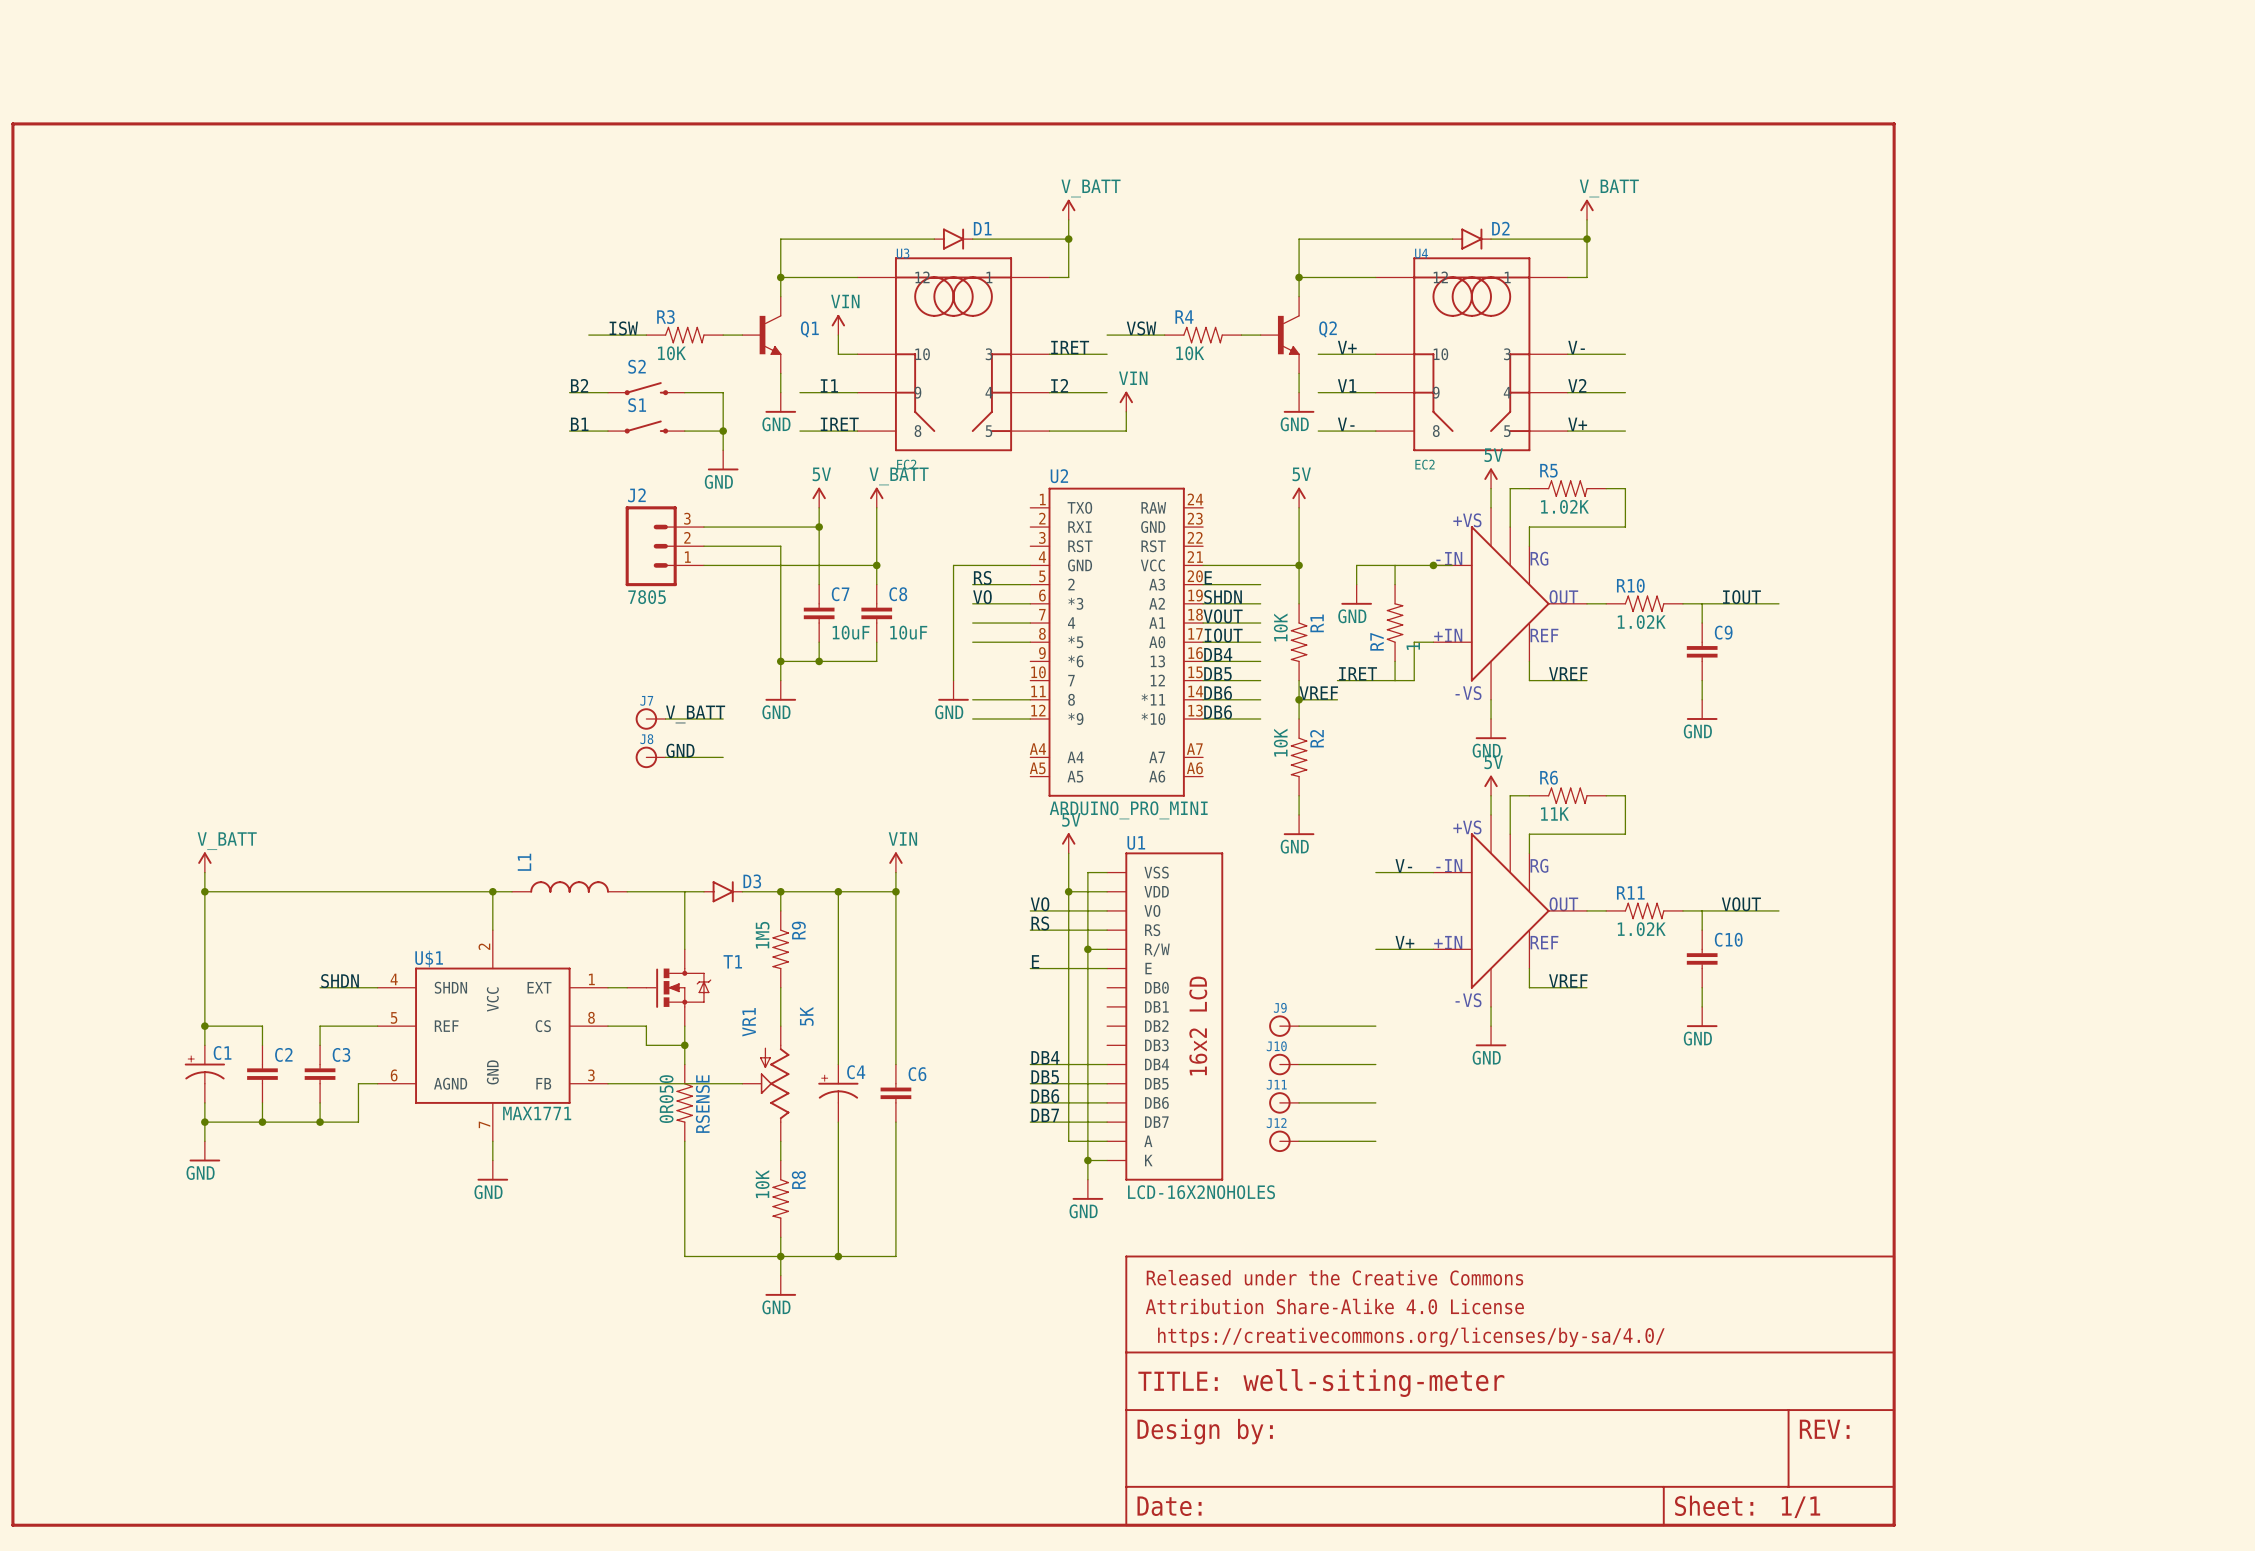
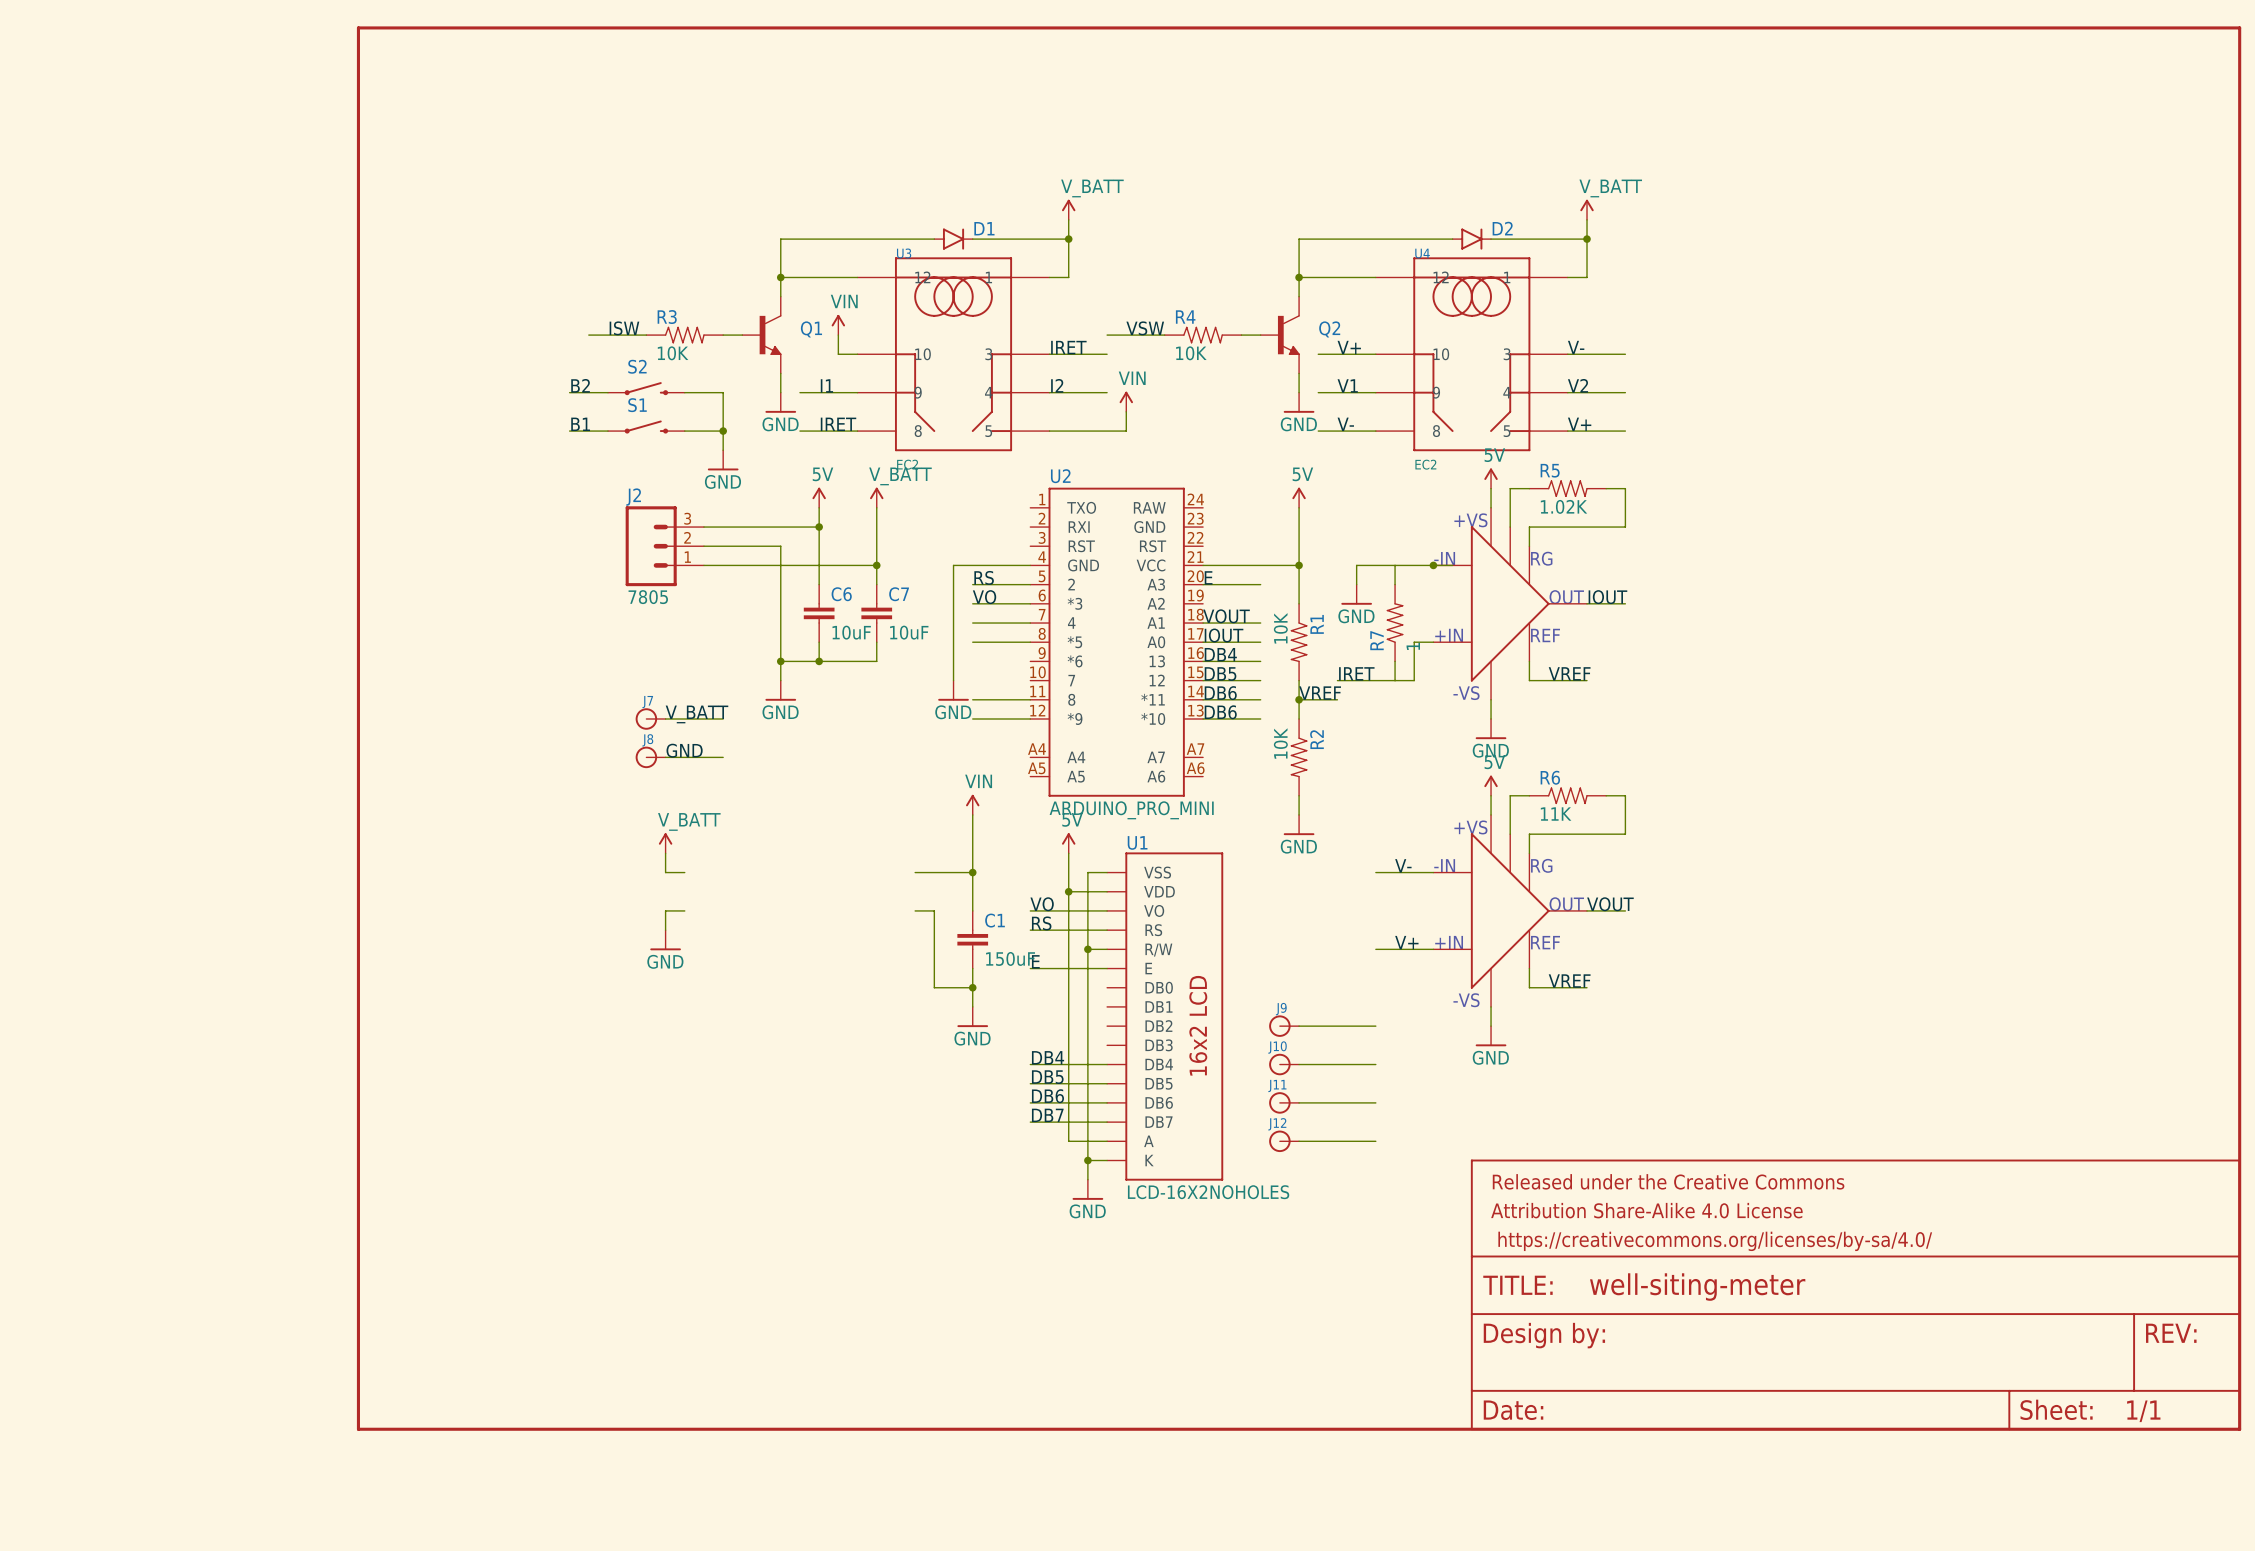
C7 name: C7 (840, 594) -> C6 (841, 594)
C8 name: C8 (898, 594) -> C7 (899, 594)
label: SHDN (1223, 597) -> none
label position: IOUT (1741, 597) -> IOUT (1607, 597)
wire: (1203, 603) (1260, 603) -> none
R10: 1.02K (1644, 603) -> none
wire: (1682, 603) (1778, 603) -> none
wire: (1702, 603) (1702, 623) -> none
C9: (1702, 651) -> none
wire: (1702, 680) (1702, 699) -> none
power symbol: GND (1702, 709) -> none
part: none -> (1299, 728)
wire: none -> (972, 814) (972, 910)
part: (953, 824) -> none
power symbol: none -> V_BATT (665, 843)
wire: none -> (665, 853) (665, 872) (684, 872)
power symbol: V_BATT (204, 862) -> none
power symbol position: VIN (895, 862) -> VIN (972, 804)
wire: (204, 872) (204, 1045) -> none
wire: (895, 872) (895, 1064) -> none
wire: none -> (915, 872) (972, 872)
junction: none -> (972, 872)
L1: (569, 886) -> none
wire: (204, 891) (512, 891) -> none
junction: (204, 891) -> none
wire: (492, 891) (492, 930) -> none
junction: (492, 891) -> none
wire: (627, 891) (703, 891) -> none
wire: (684, 891) (684, 949) -> none
D3: (723, 891) -> none
wire: (742, 891) (895, 891) -> none
wire: (780, 891) (780, 910) -> none
junction: (780, 891) -> none
wire: (838, 891) (838, 1064) -> none
junction: (838, 891) -> none
junction: (895, 891) -> none
label position: VOUT (1741, 904) -> VOUT (1610, 904)
wire: none -> (684, 910) (665, 910) (665, 930)
wire: none -> (915, 910) (934, 910) (934, 987) (972, 987)
R11: 1.02K (1644, 910) -> none
wire: (1682, 910) (1778, 910) -> none
wire: (1702, 910) (1702, 930) -> none
power symbol: none -> GND (665, 940)
R9: 1M5 (780, 949) -> none
C1 value: none -> 150uF (1010, 958)
C10: (1702, 958) -> none
wire: none -> (972, 968) (972, 1006)
label: SHDN (340, 981) -> none
wire: (320, 987) (377, 987) -> none
wire: (608, 987) (627, 987) -> none
T1: (669, 987) -> none
wire: (780, 987) (780, 1026) -> none
junction: none -> (972, 987)
wire: (1702, 987) (1702, 1006) -> none
power symbol: none -> GND (972, 1017)
power symbol: GND (1702, 1017) -> none
wire: (204, 1026) (262, 1026) (262, 1045) -> none
junction: (204, 1026) -> none
wire: (377, 1026) (320, 1026) (320, 1045) -> none
wire: (608, 1026) (646, 1026) (646, 1045) (684, 1045) -> none
wire: (684, 1026) (684, 1064) -> none
U$1: MAX1771 (492, 1035) -> none
C1 symbol: [184, 1045, 226, 1103] -> [957, 910, 989, 969]
junction: (684, 1045) -> none
C2: (262, 1074) -> none
C3: (320, 1074) -> none
wire: (377, 1083) (358, 1083) (358, 1122) (204, 1122) -> none
wire: (608, 1083) (742, 1083) -> none
VR1: 5K (765, 1083) -> none
C4: (838, 1093) -> none
C6: (895, 1093) -> none
wire: (204, 1102) (204, 1141) -> none
wire: (262, 1102) (262, 1122) -> none
wire: (320, 1102) (320, 1122) -> none
RSENSE: 0R050 (684, 1102) -> none
junction: (204, 1122) -> none
junction: (262, 1122) -> none
junction: (320, 1122) -> none
wire: (838, 1122) (838, 1256) -> none
wire: (895, 1122) (895, 1256) (684, 1256) (684, 1141) -> none
wire: (492, 1141) (492, 1160) -> none
wire: (780, 1141) (780, 1160) -> none
power symbol: GND (204, 1151) -> none
power symbol: GND (492, 1170) -> none
R8: 10K (780, 1198) -> none
wire: (780, 1237) (780, 1275) -> none
junction: (780, 1256) -> none
junction: (838, 1256) -> none
power symbol: GND (780, 1285) -> none
part: none -> (1855, 1294)
part: (1510, 1390) -> none

